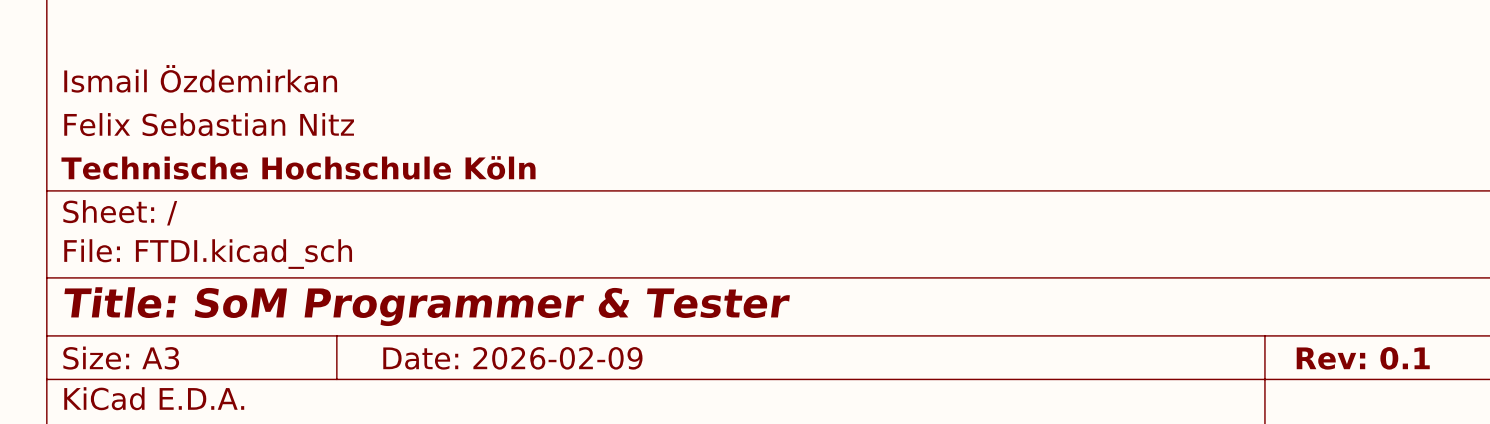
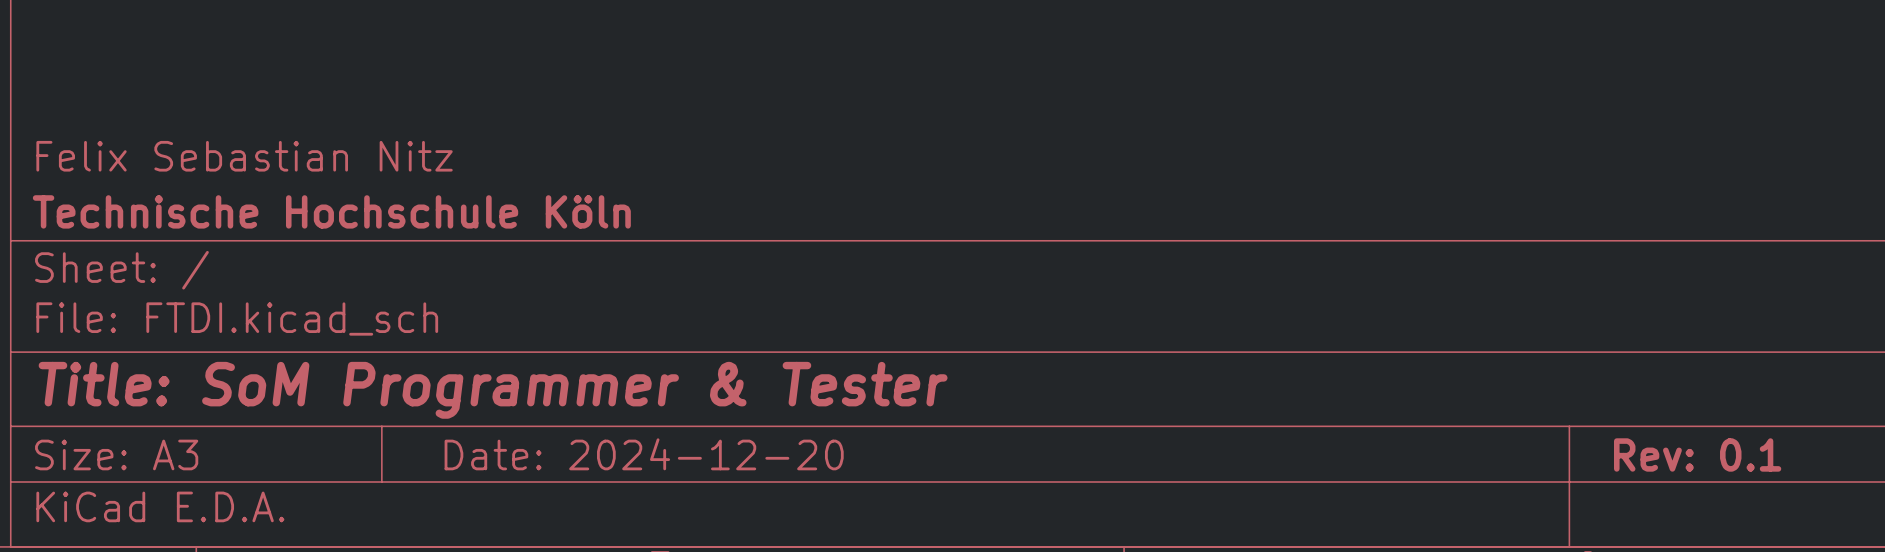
title block: Ismail Özdemirkan (200, 78) -> none
title block: Date: 2026-02-09 (512, 358) -> Date: 2024-12-20 (644, 454)

